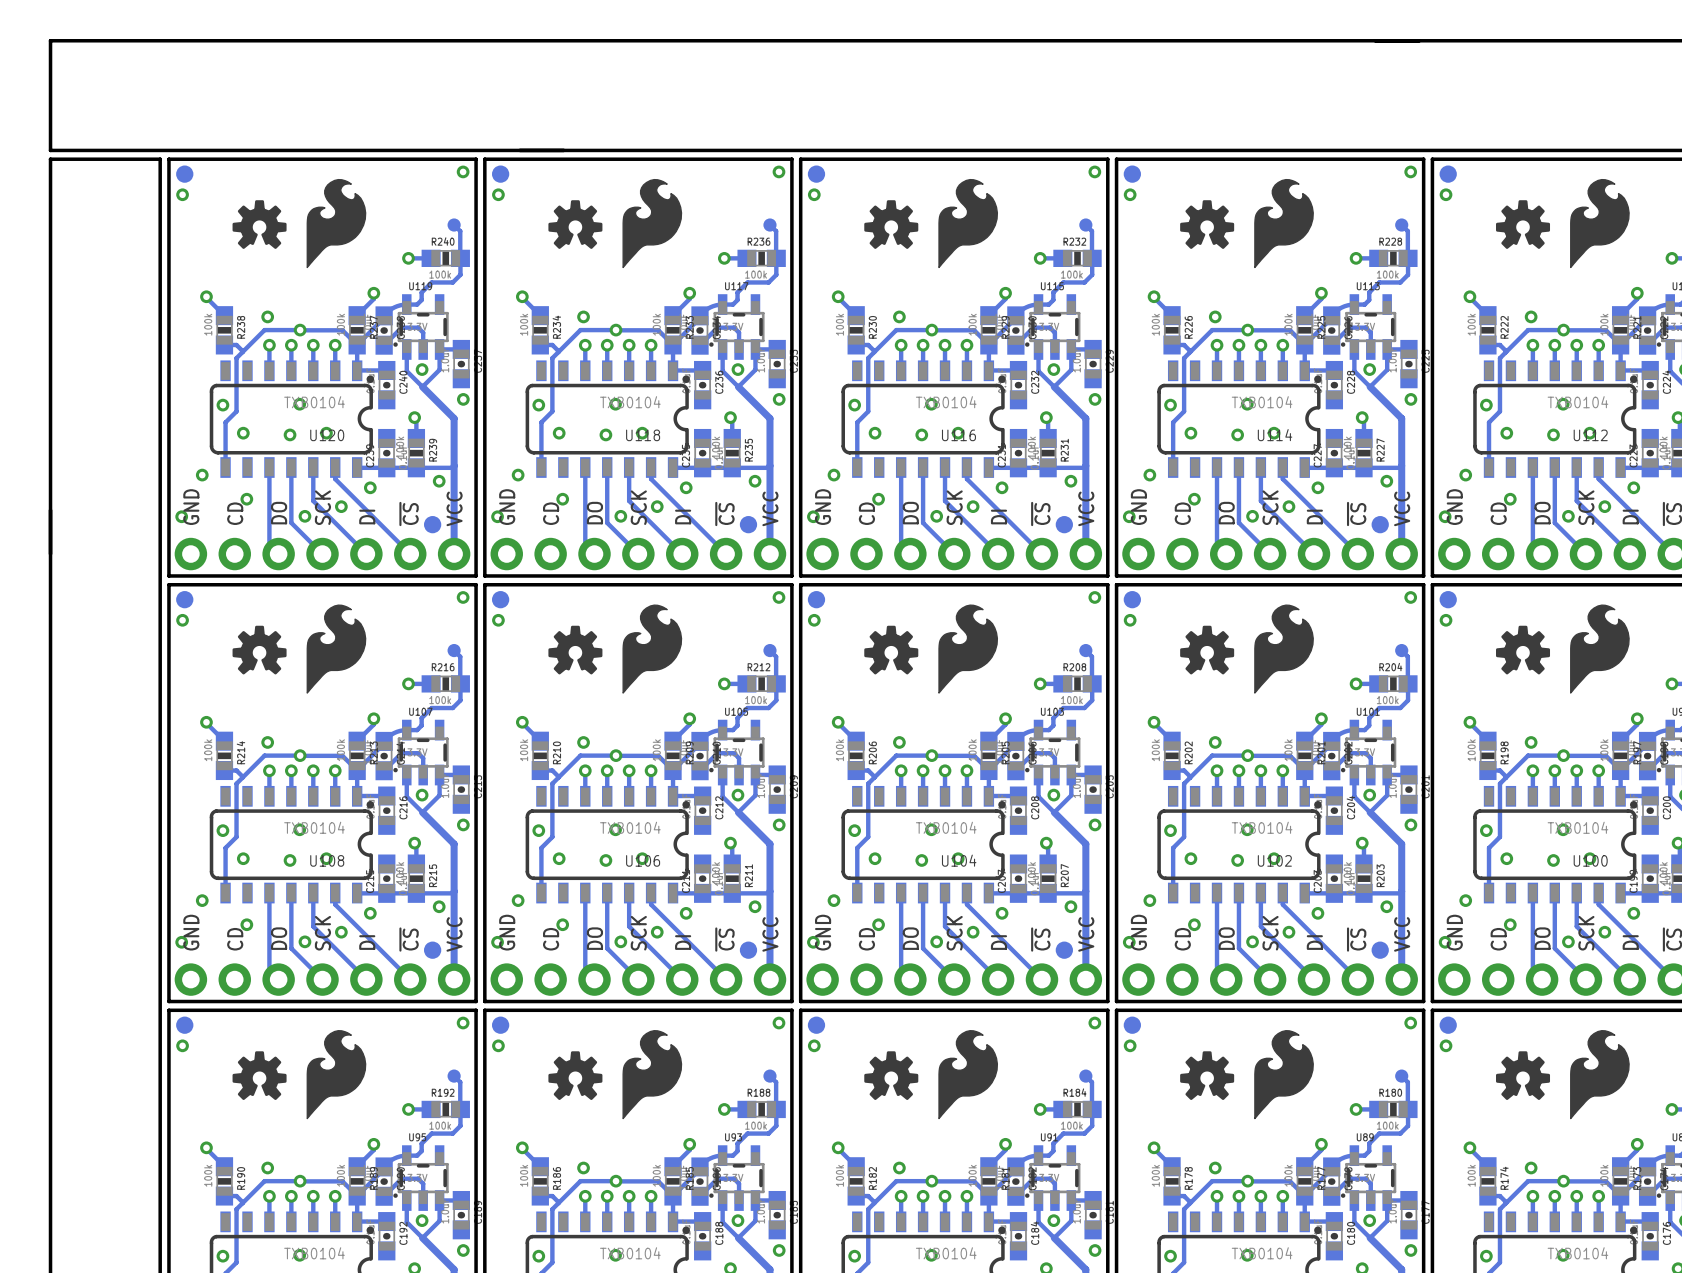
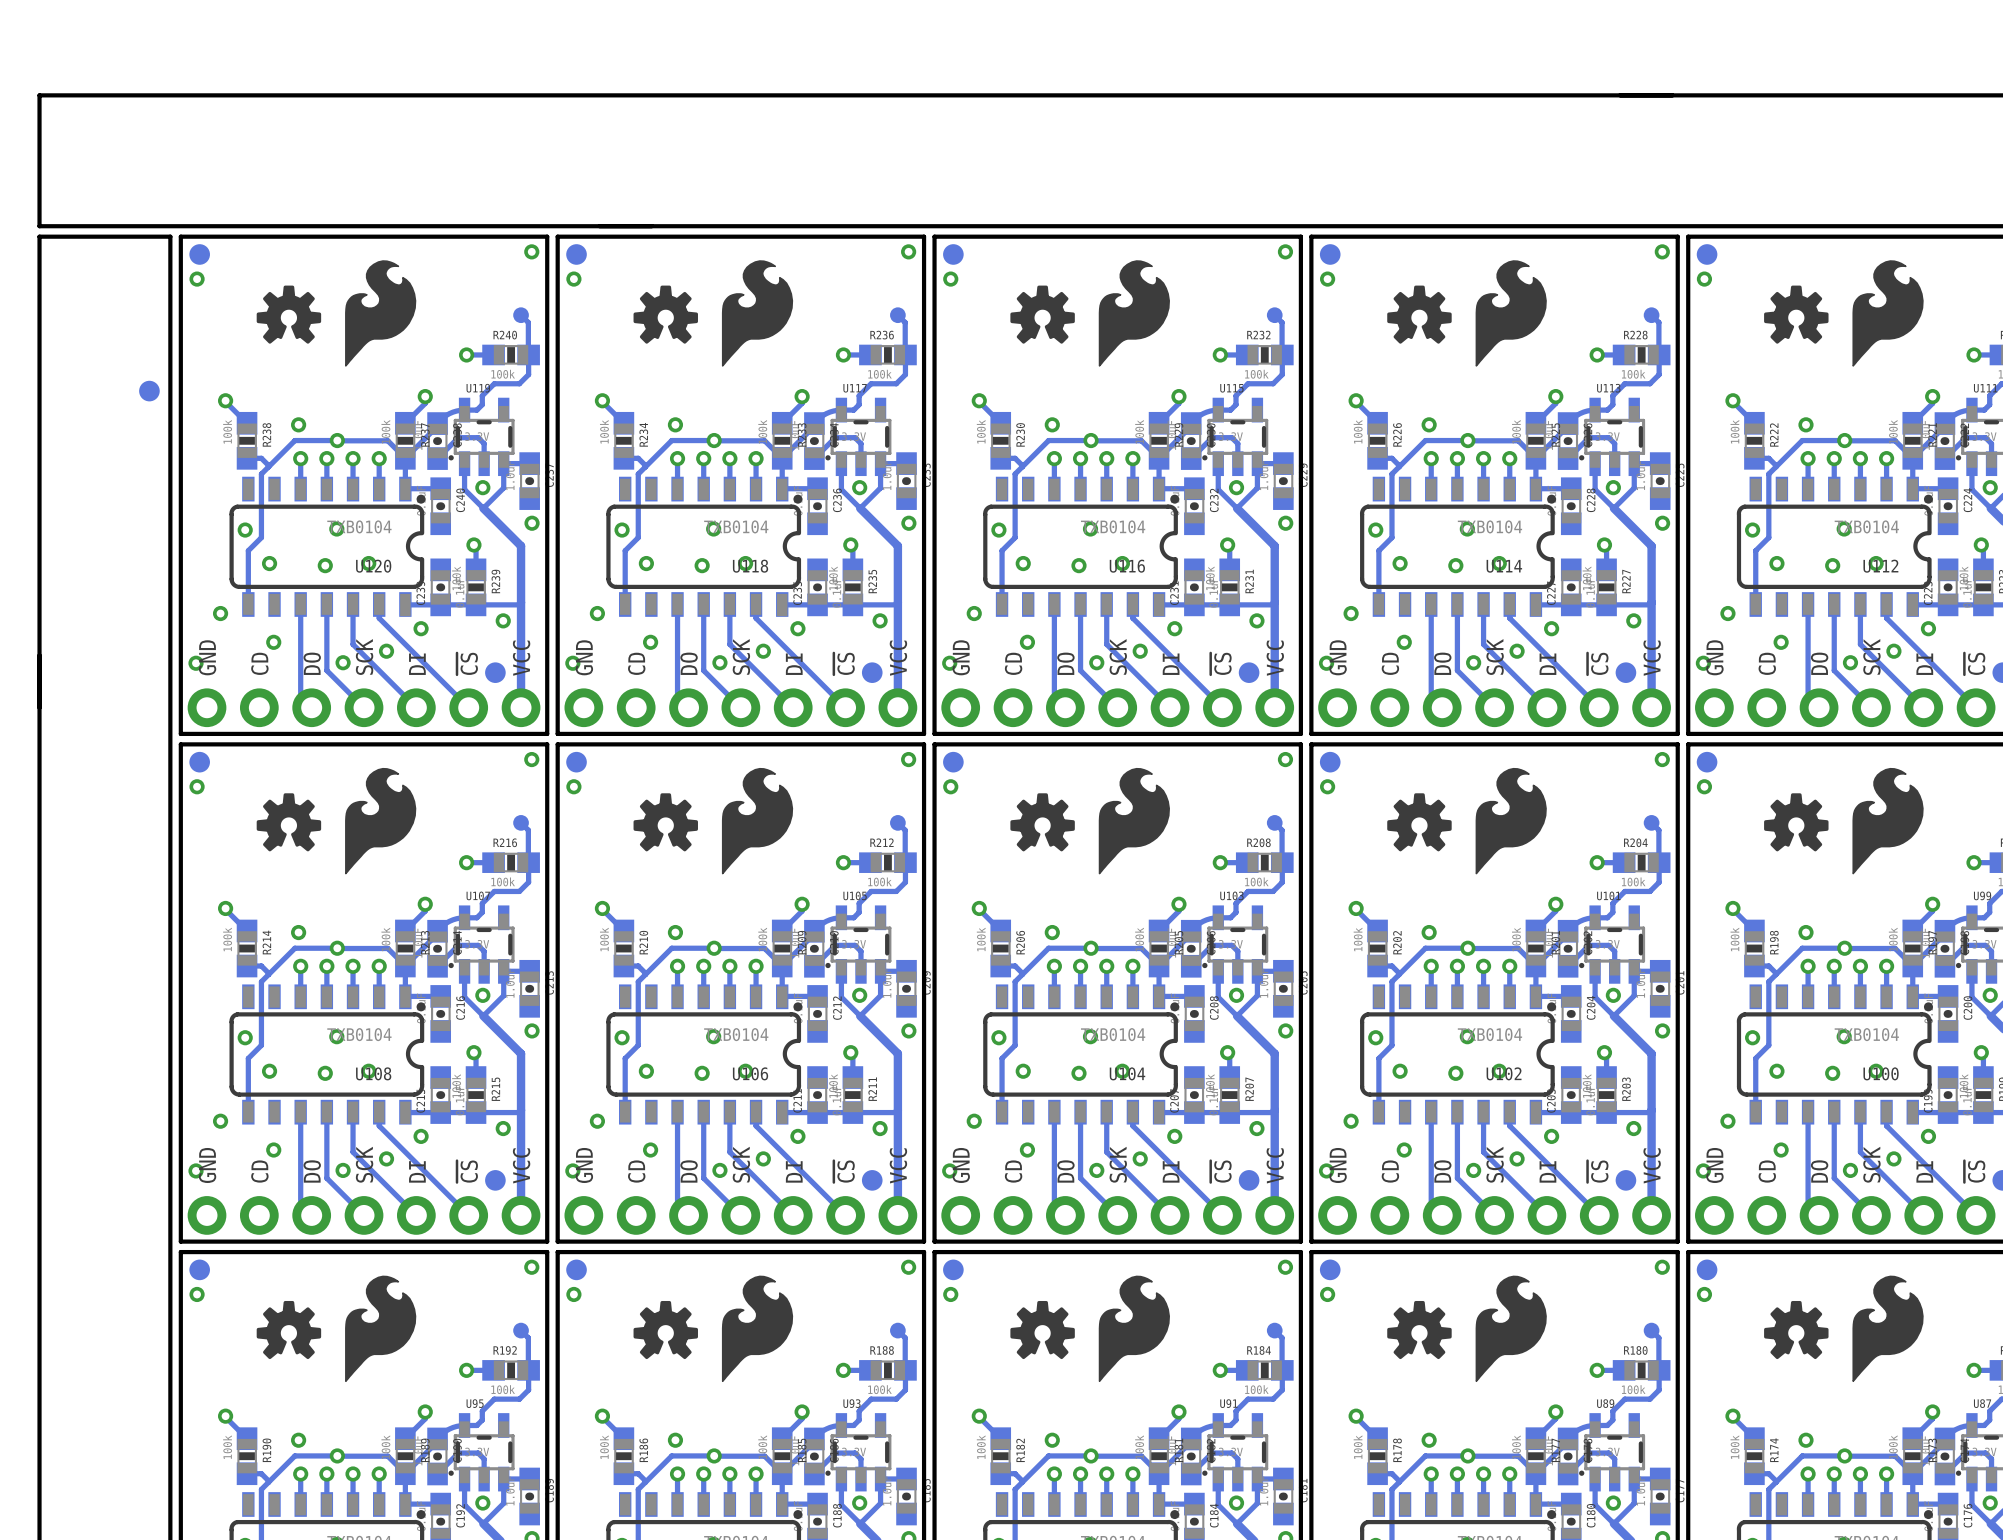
part: none -> (149, 391)

